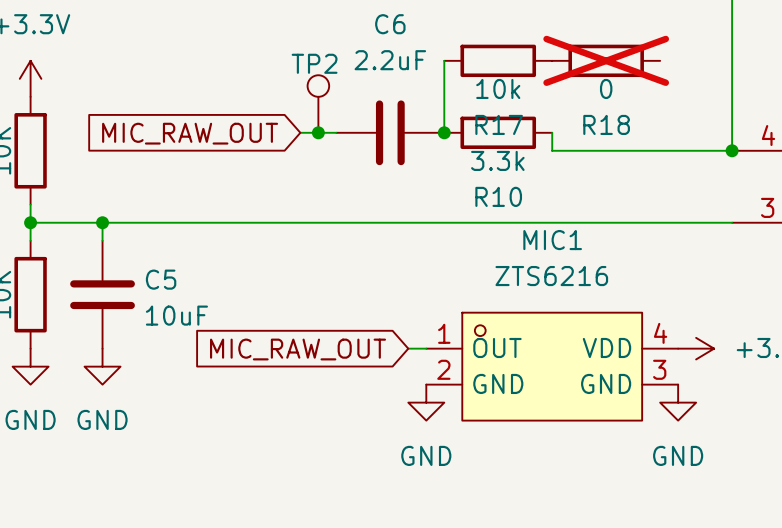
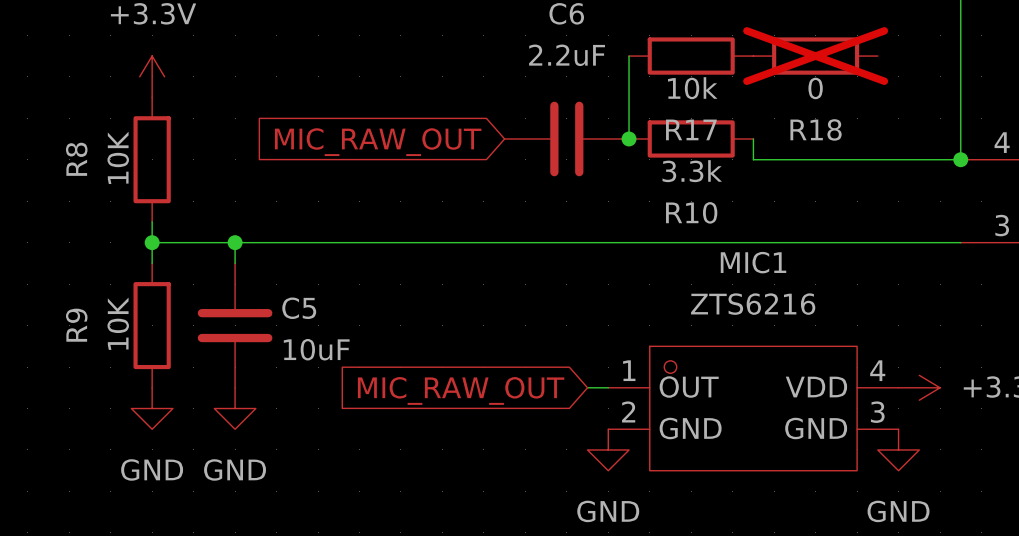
TP2: (318, 104) -> none
wire: (300, 132) (336, 132) -> none
junction: (318, 132) -> none
global label position: MIC_RAW_OUT (190, 133) -> MIC_RAW_OUT (378, 142)

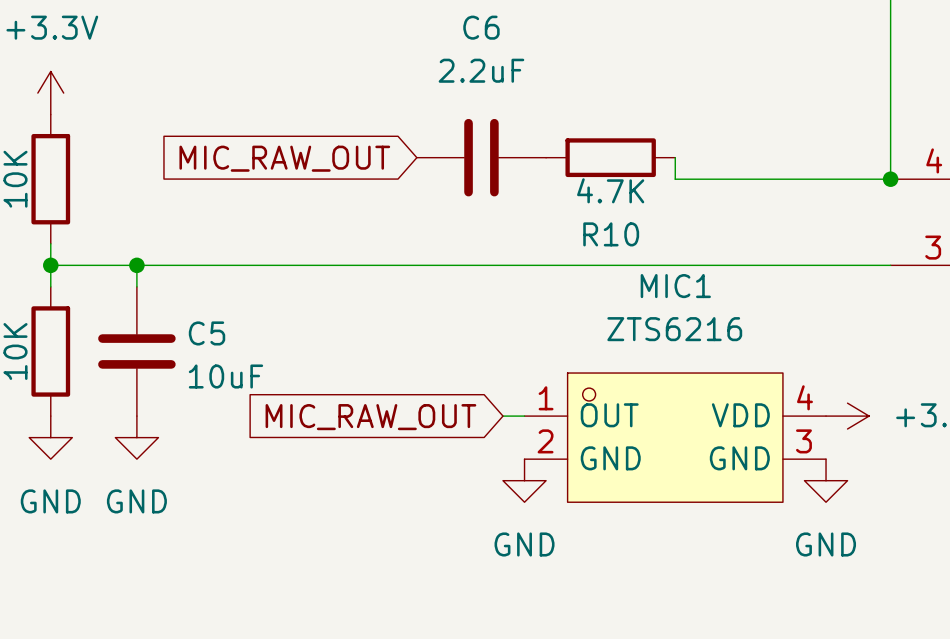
wire: (629, 56) (629, 138) -> none
R17: 10k (691, 56) -> none
R18: 0 (815, 56) -> none
junction: (629, 138) -> none
R10 value: 3.3k (692, 171) -> 4.7K (610, 190)

